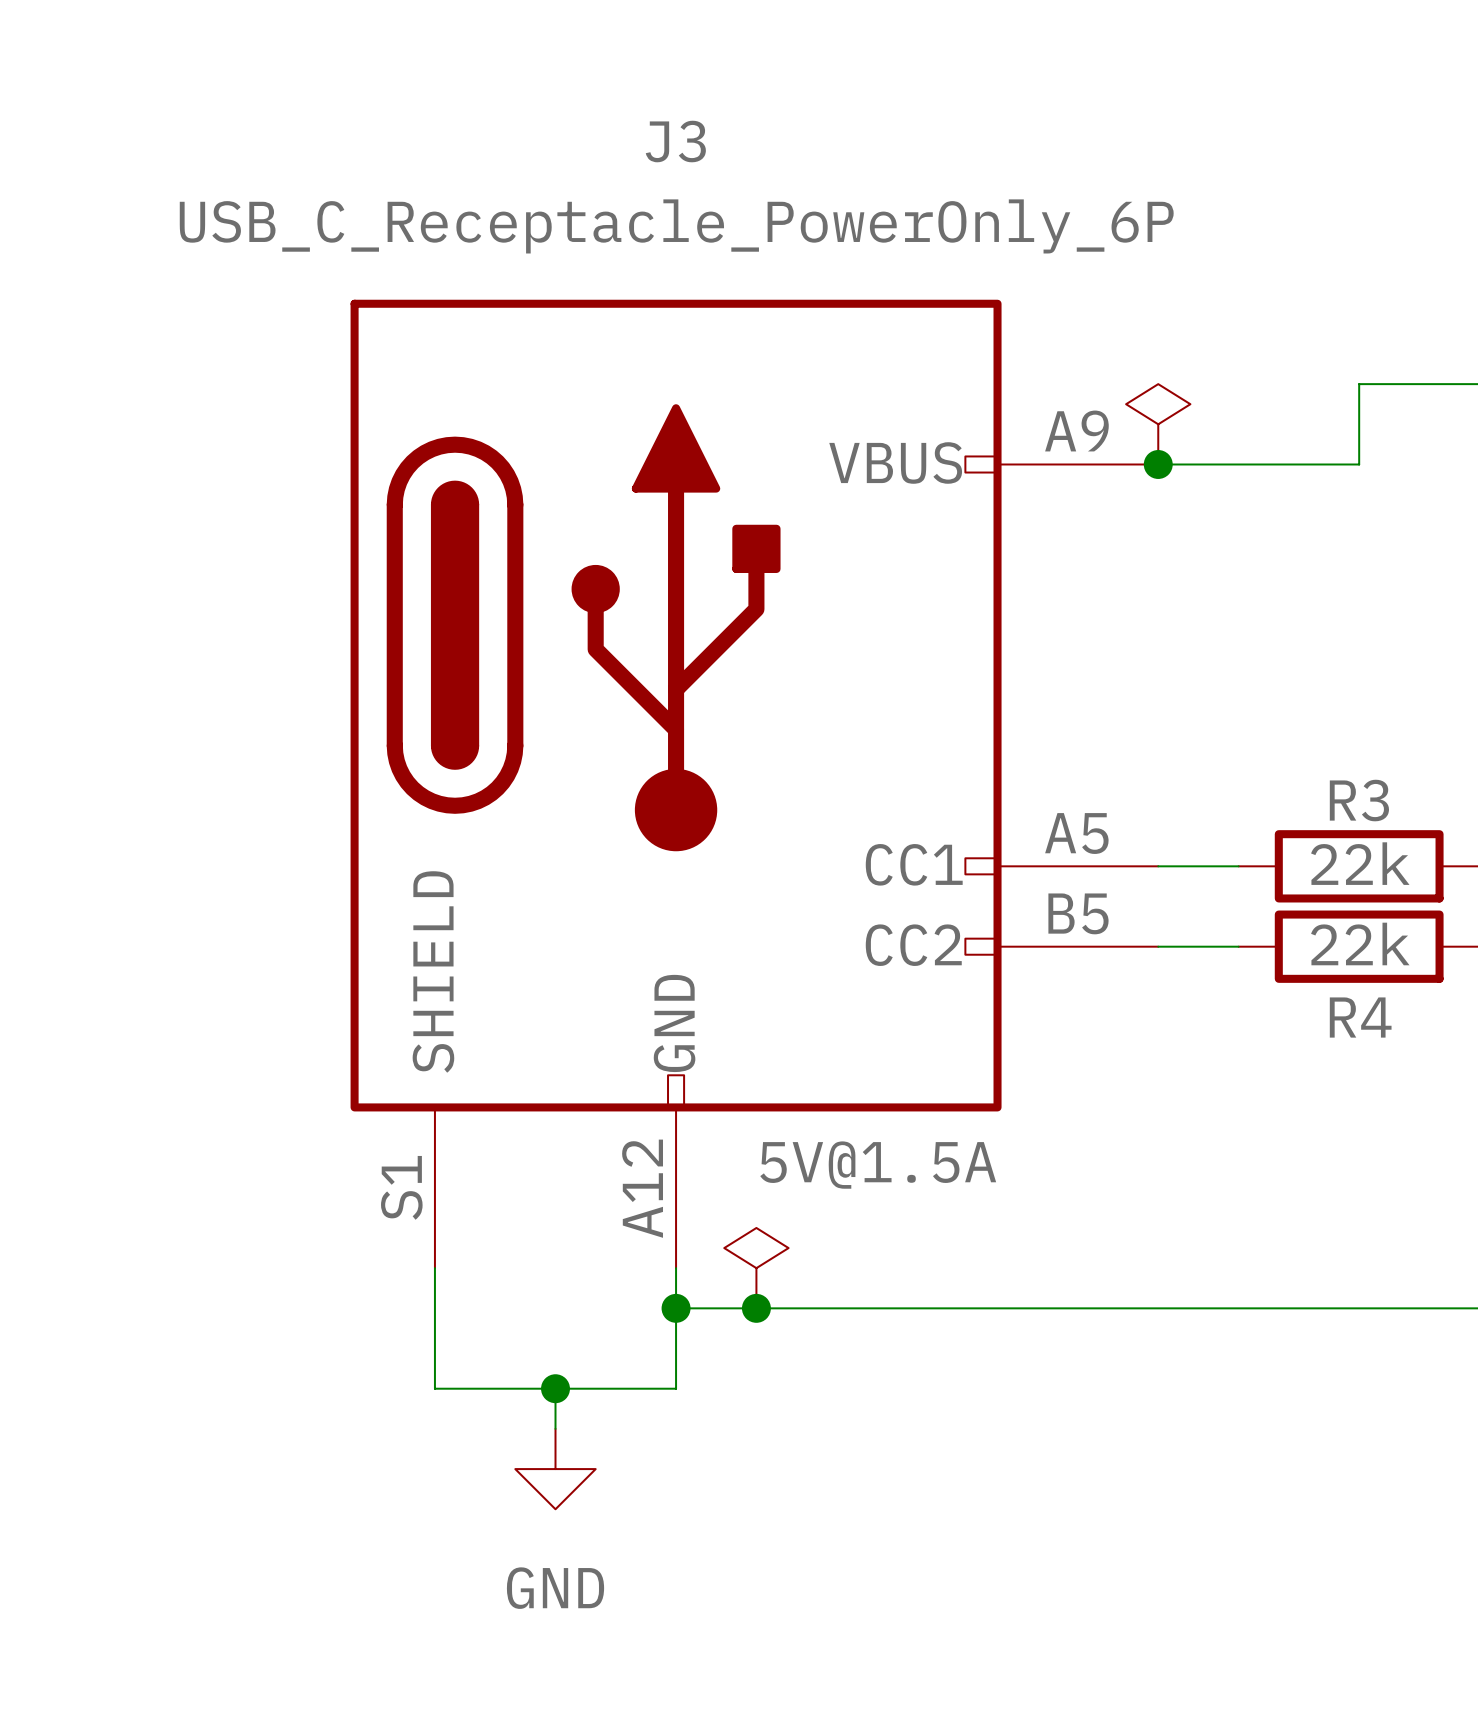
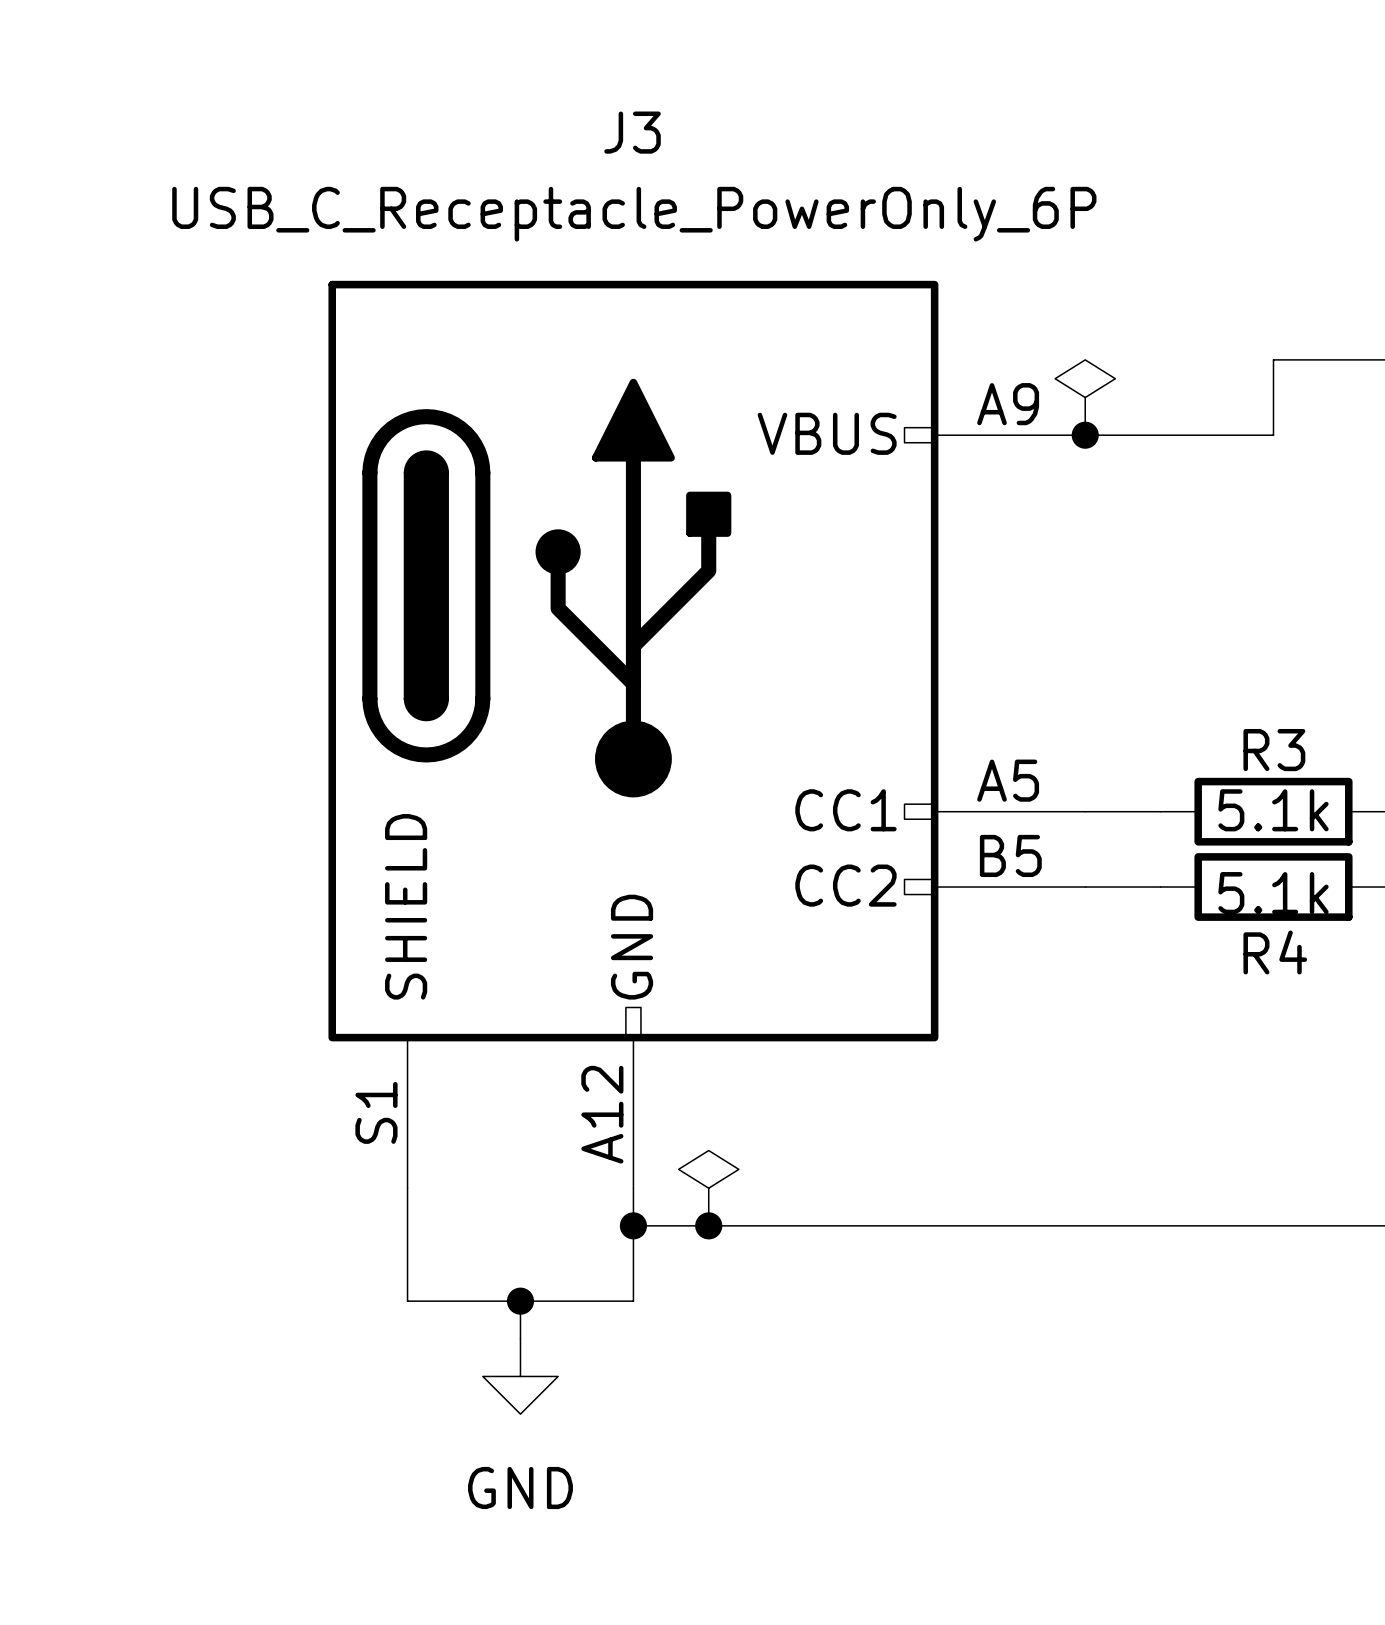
R3 value: 22k (1360, 863) -> 5.1k (1273, 810)
R4 value: 22k (1360, 943) -> 5.1k (1273, 893)
J3 text: 5V@1.5A (878, 1165) -> none

